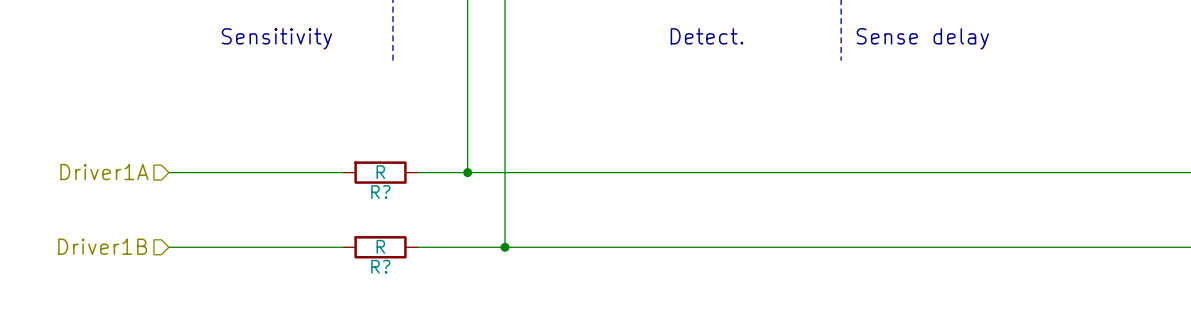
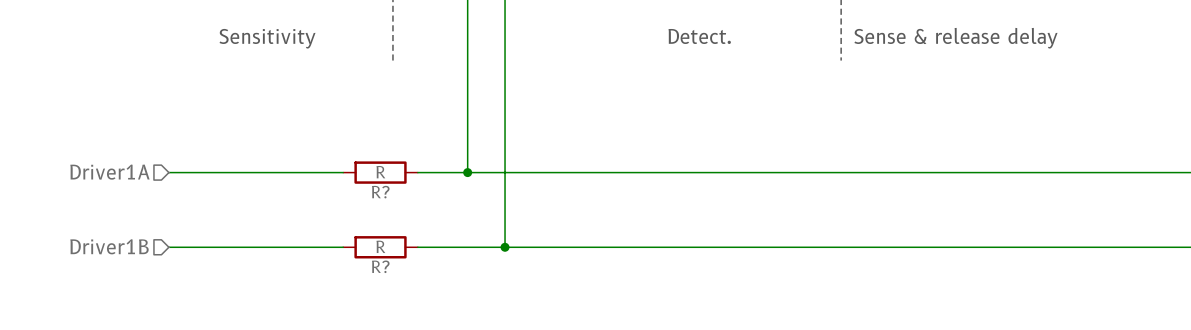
text: Sense delay (922, 38) -> Sense & release delay (955, 38)

